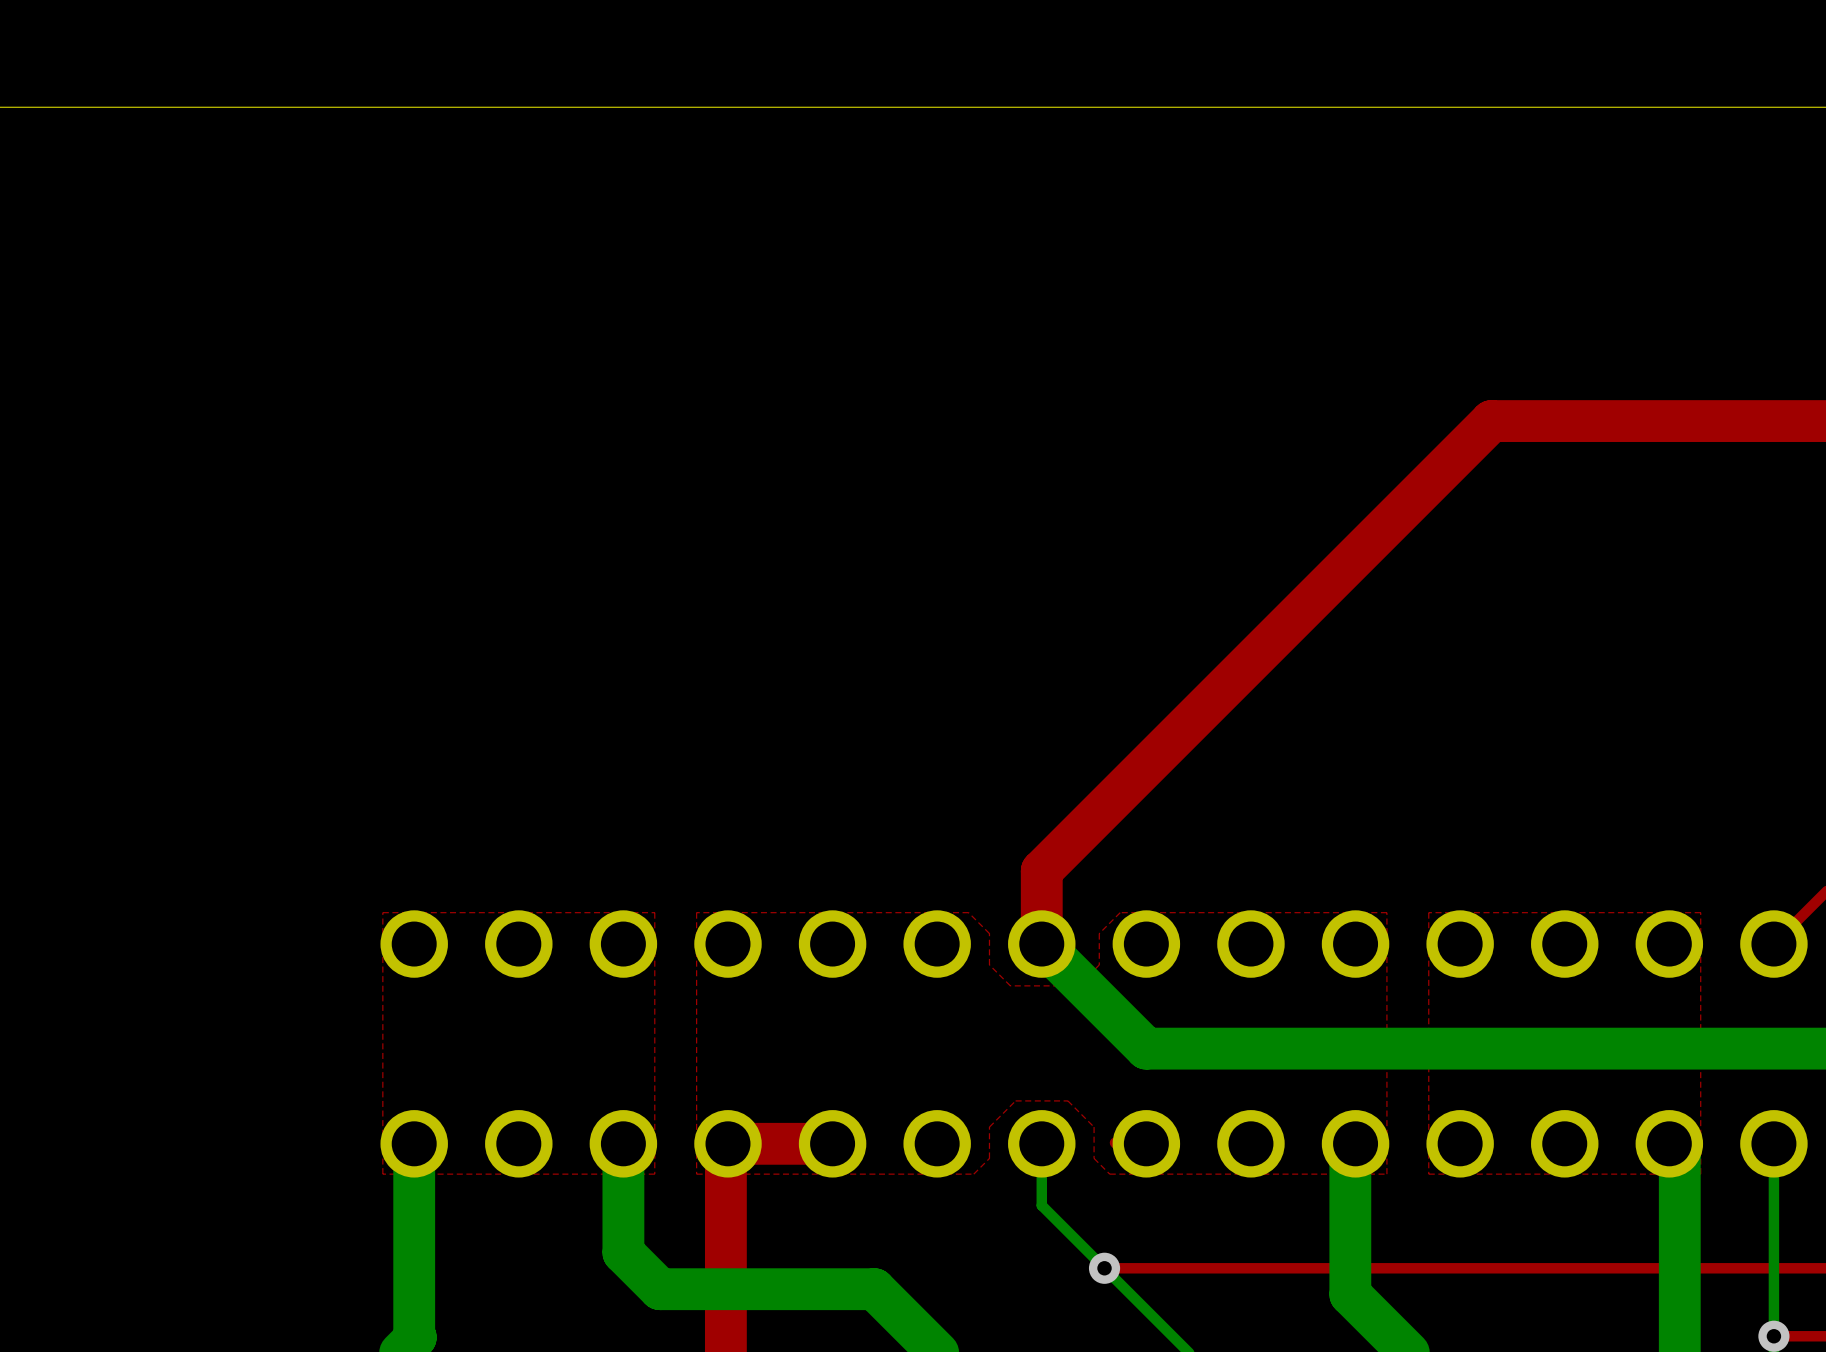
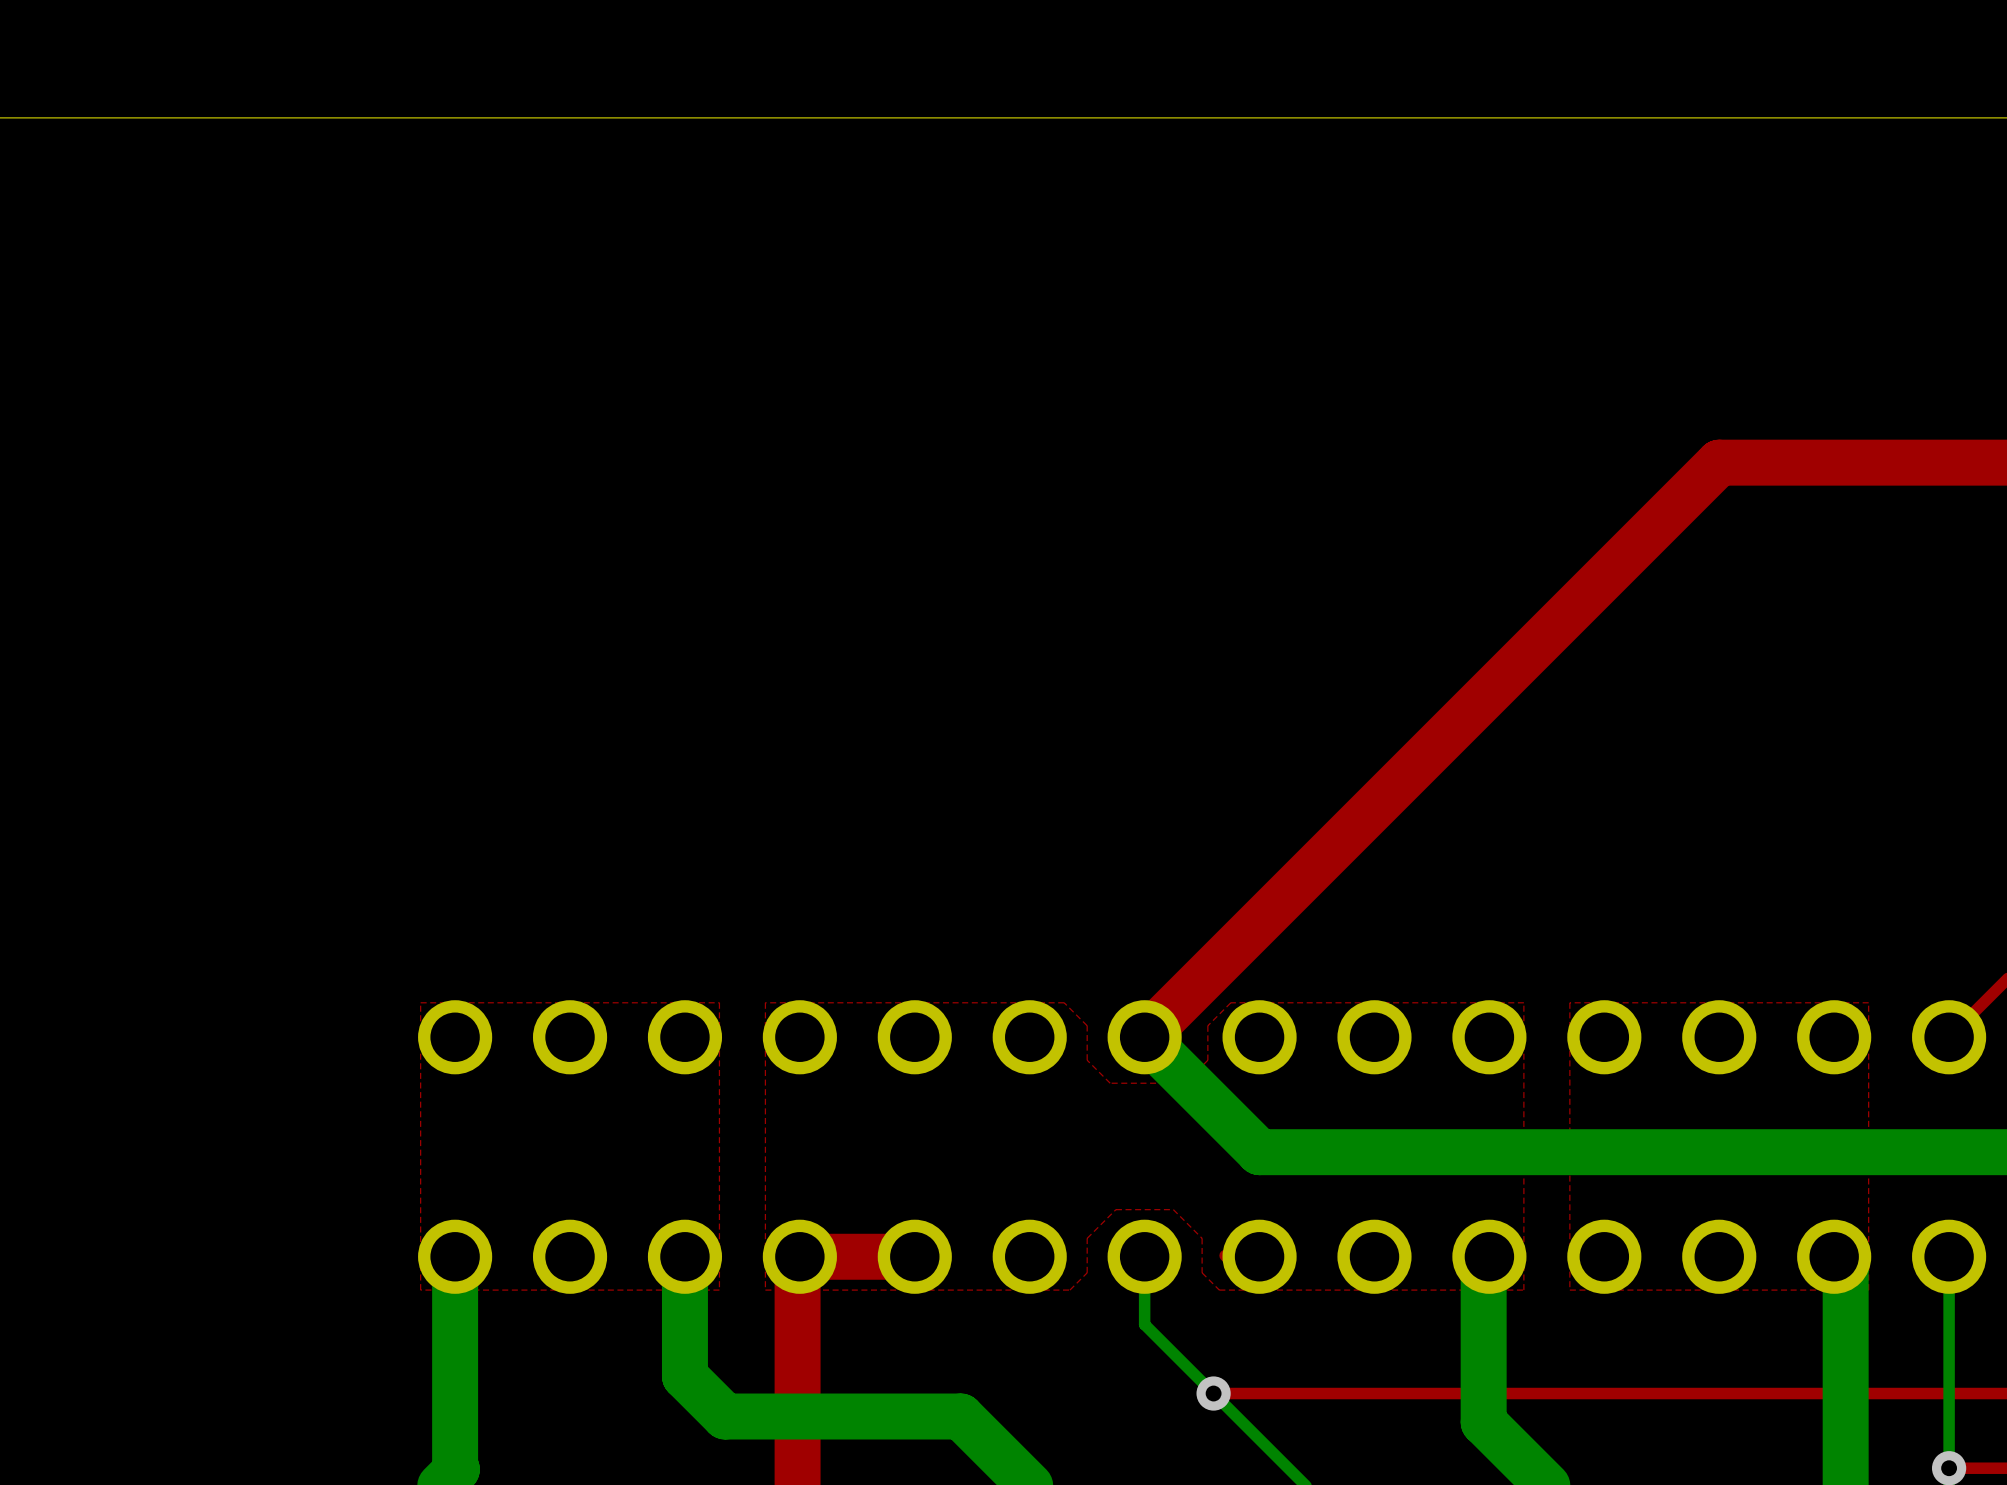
top track: (1564, 421) (1491, 421) (1041, 870) (1041, 944) -> (1719, 462) (1144, 1037)

